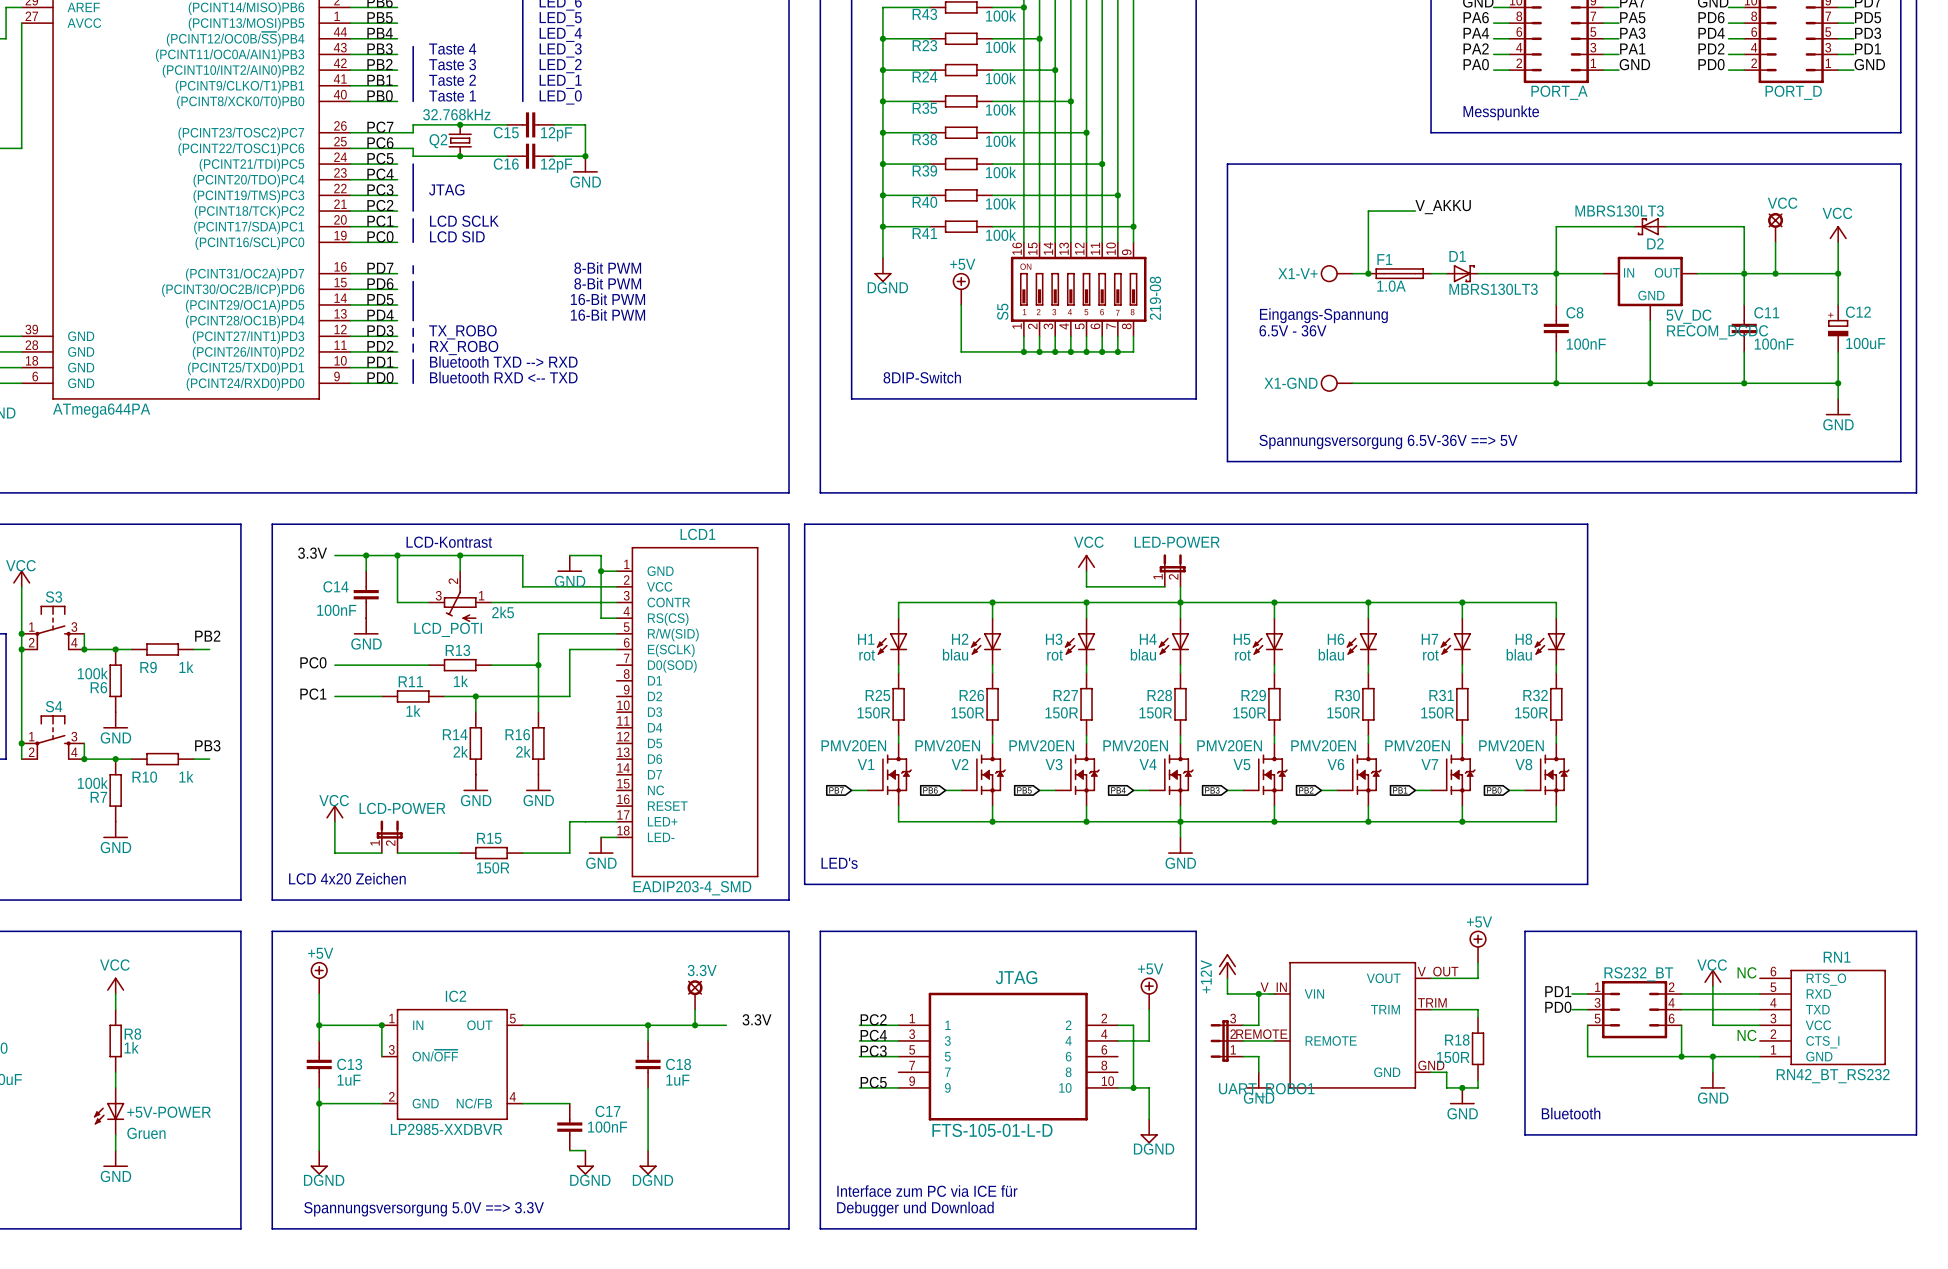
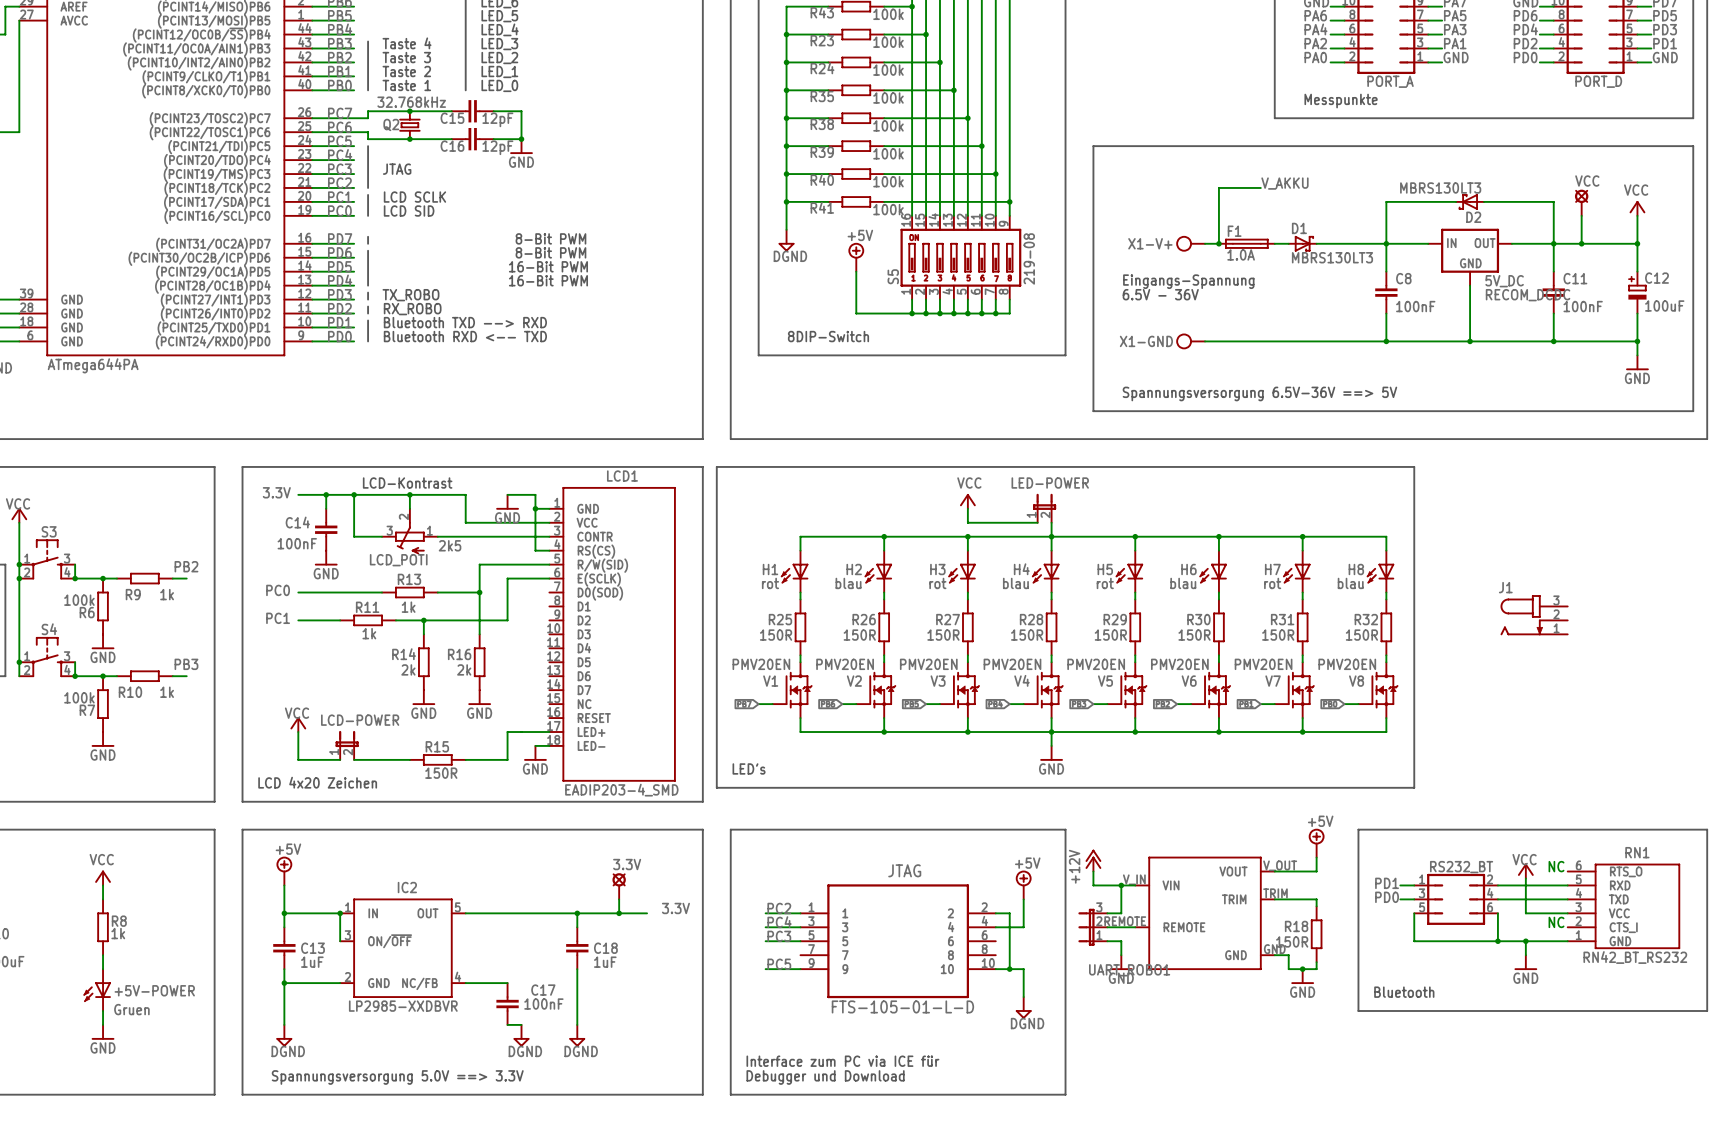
J1: none -> (1534, 615)

